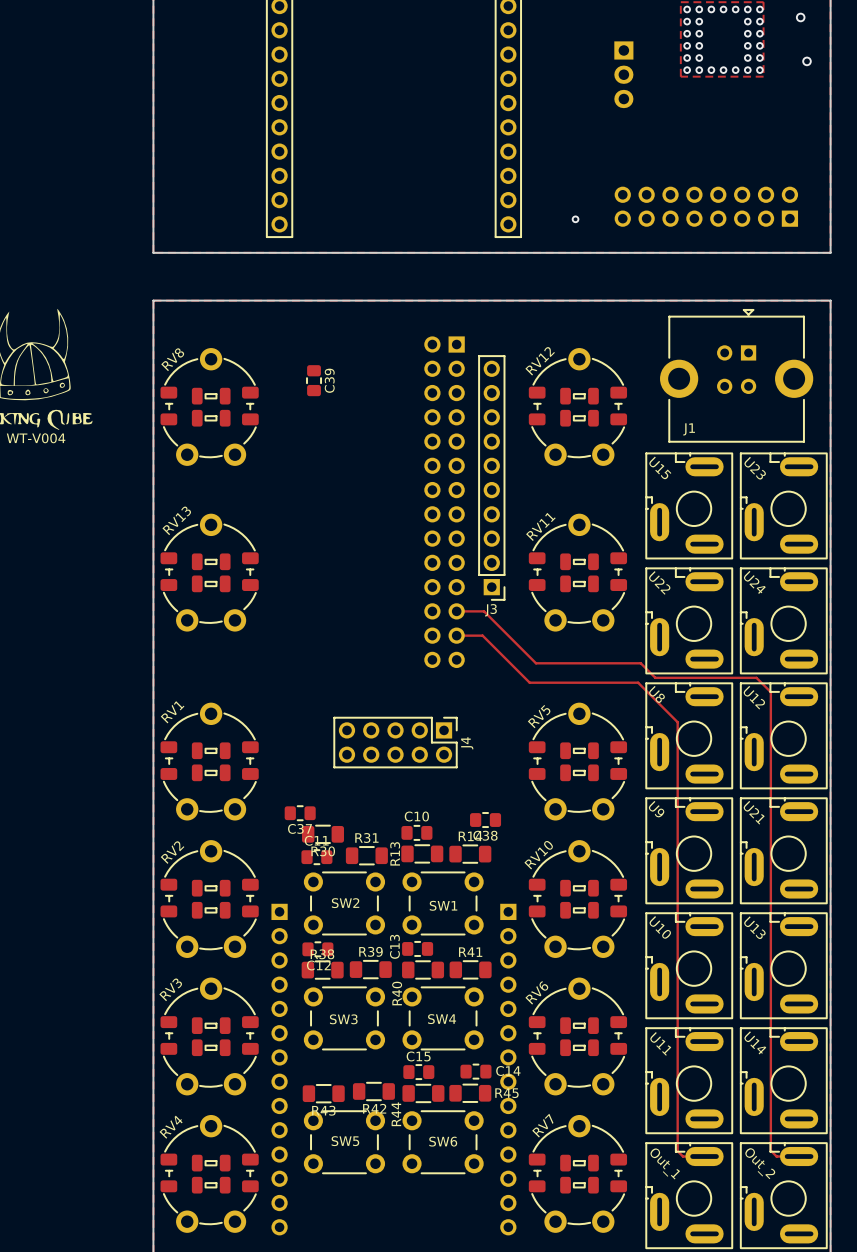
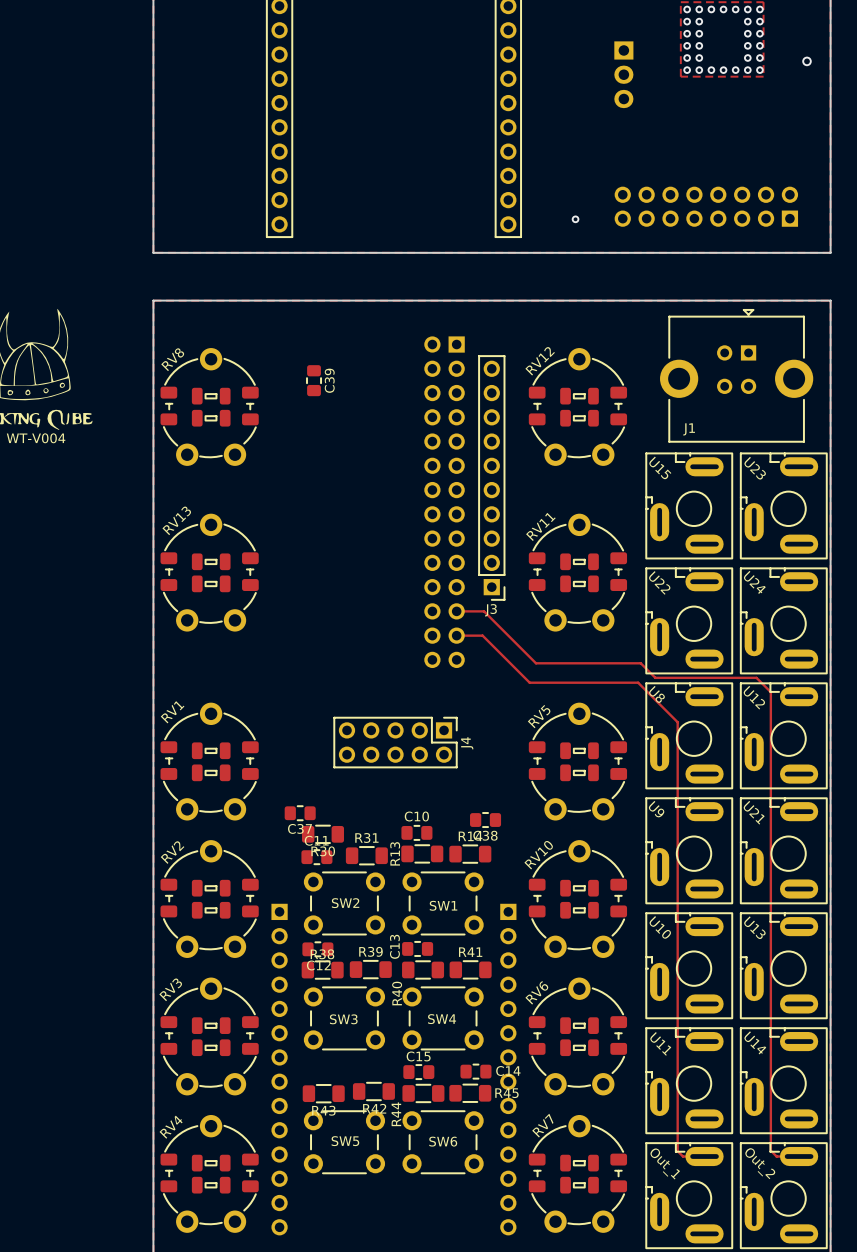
via: (800, 17) -> none

